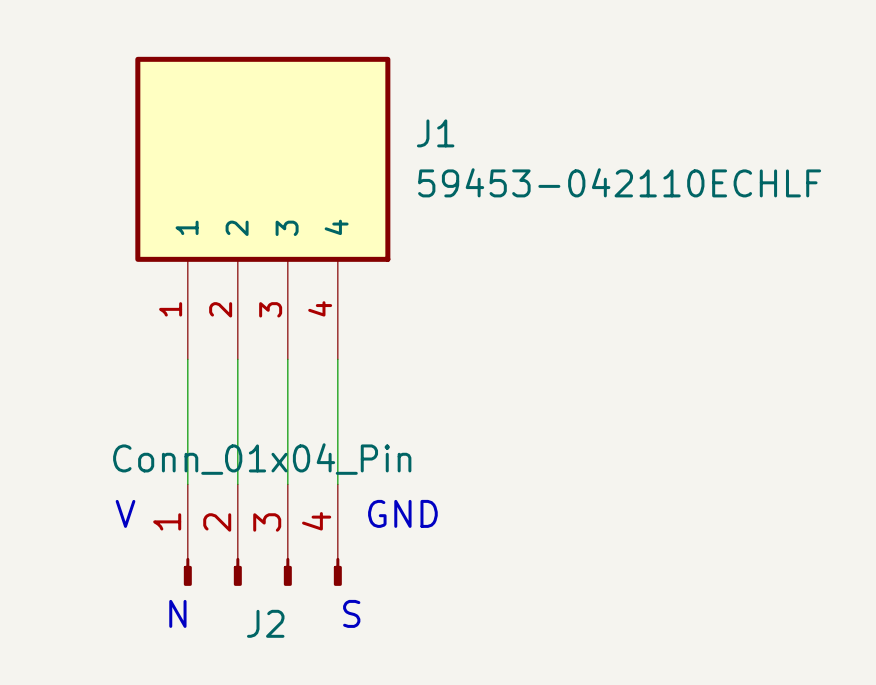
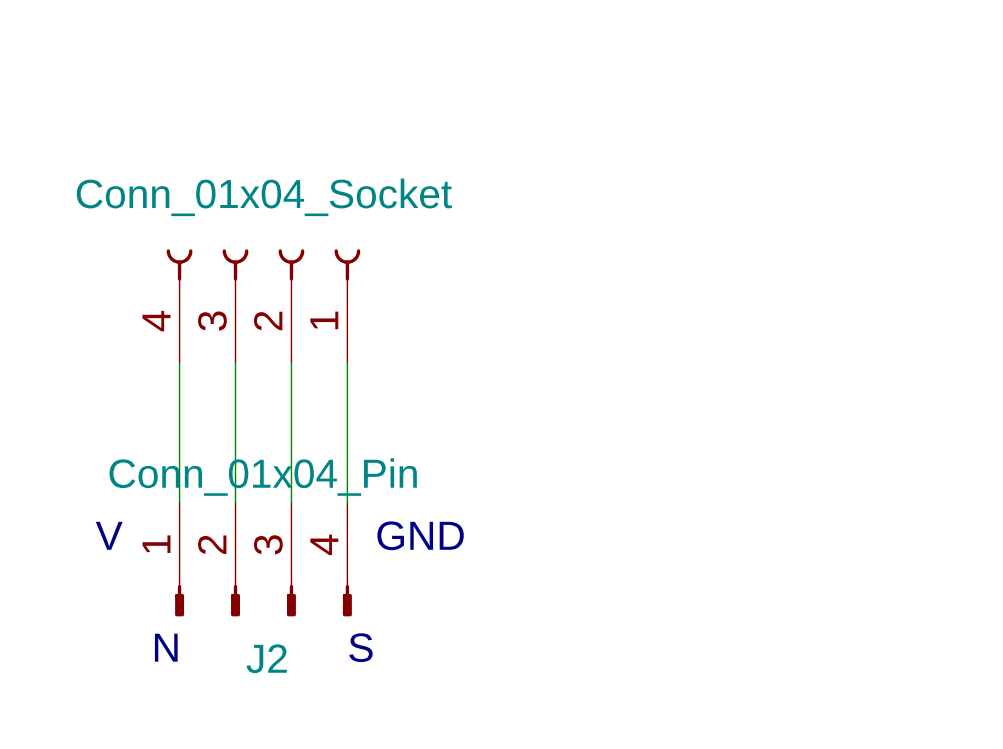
J1: 59453-042110ECHLF (262, 208) -> none
part: none -> Conn_01x04_Socket (263, 306)

